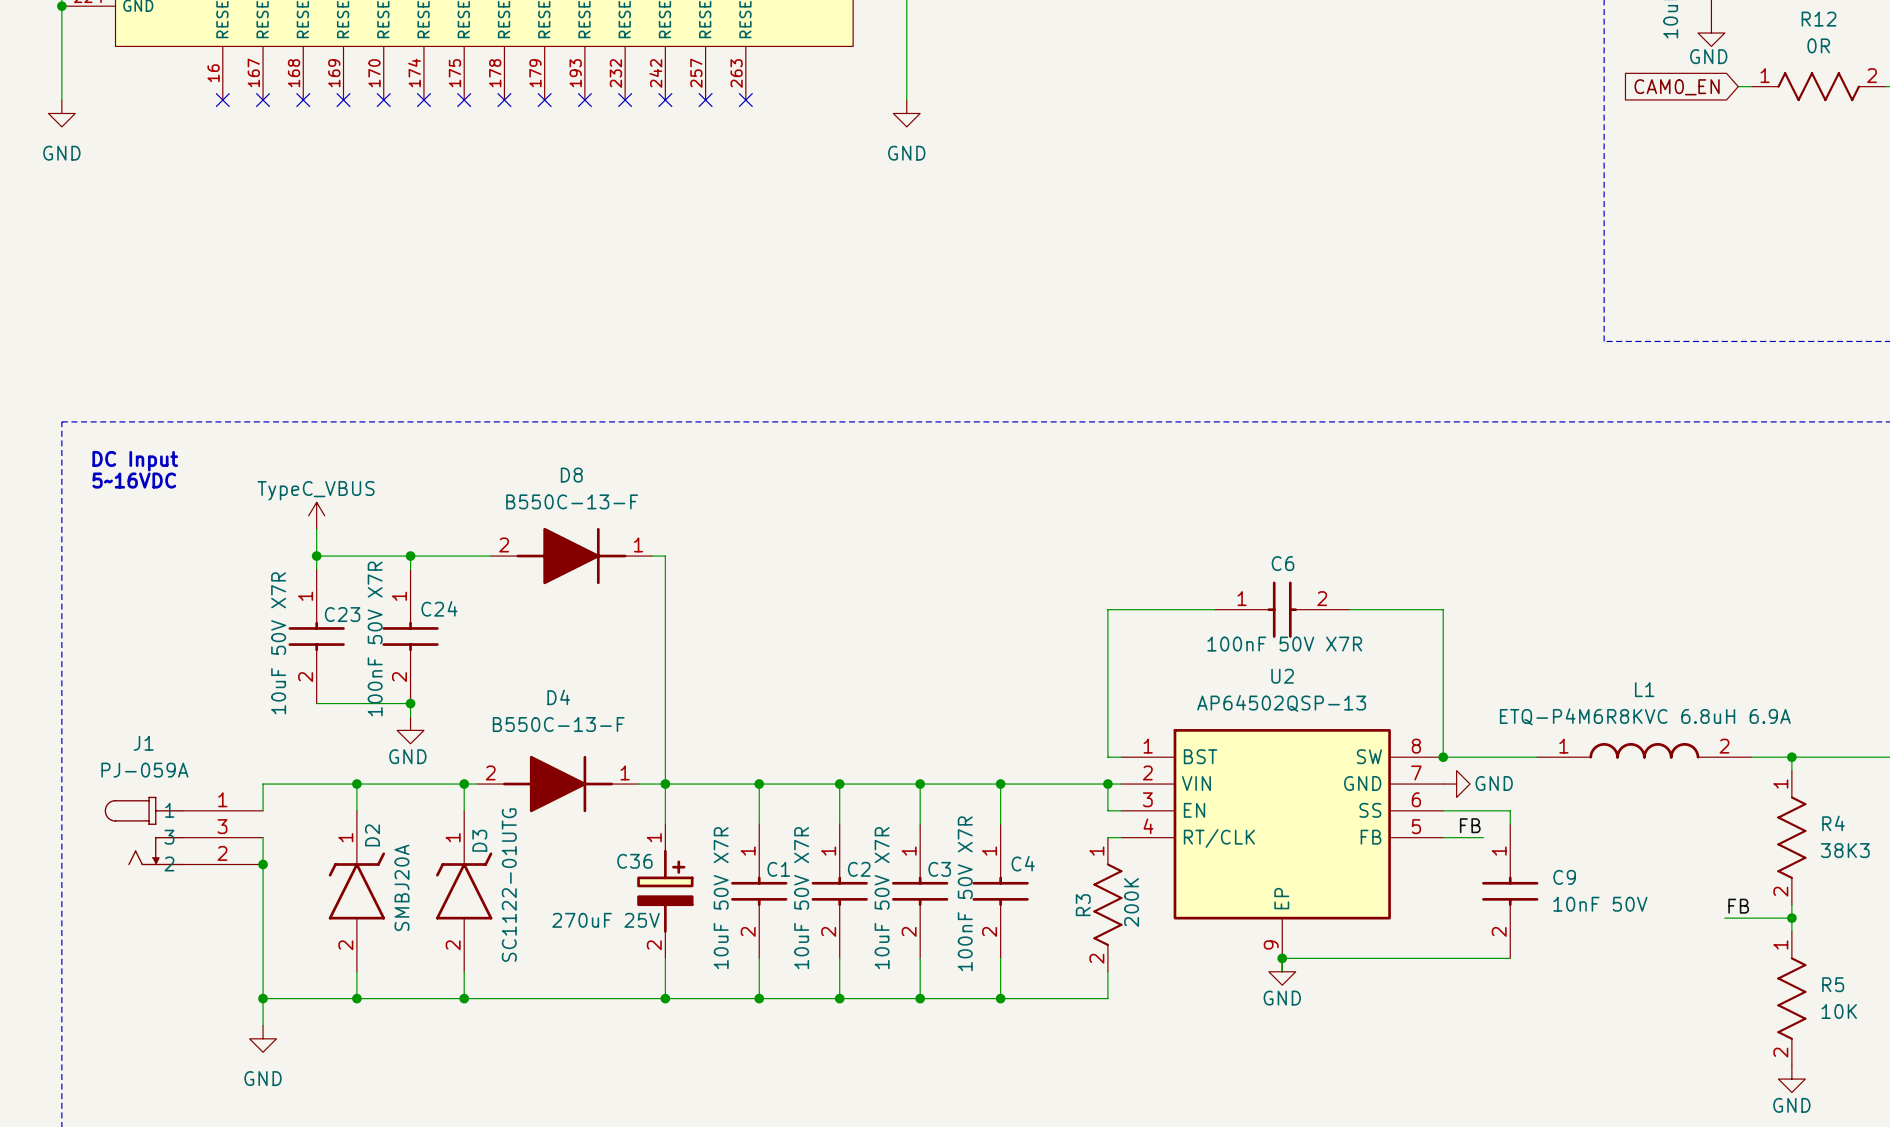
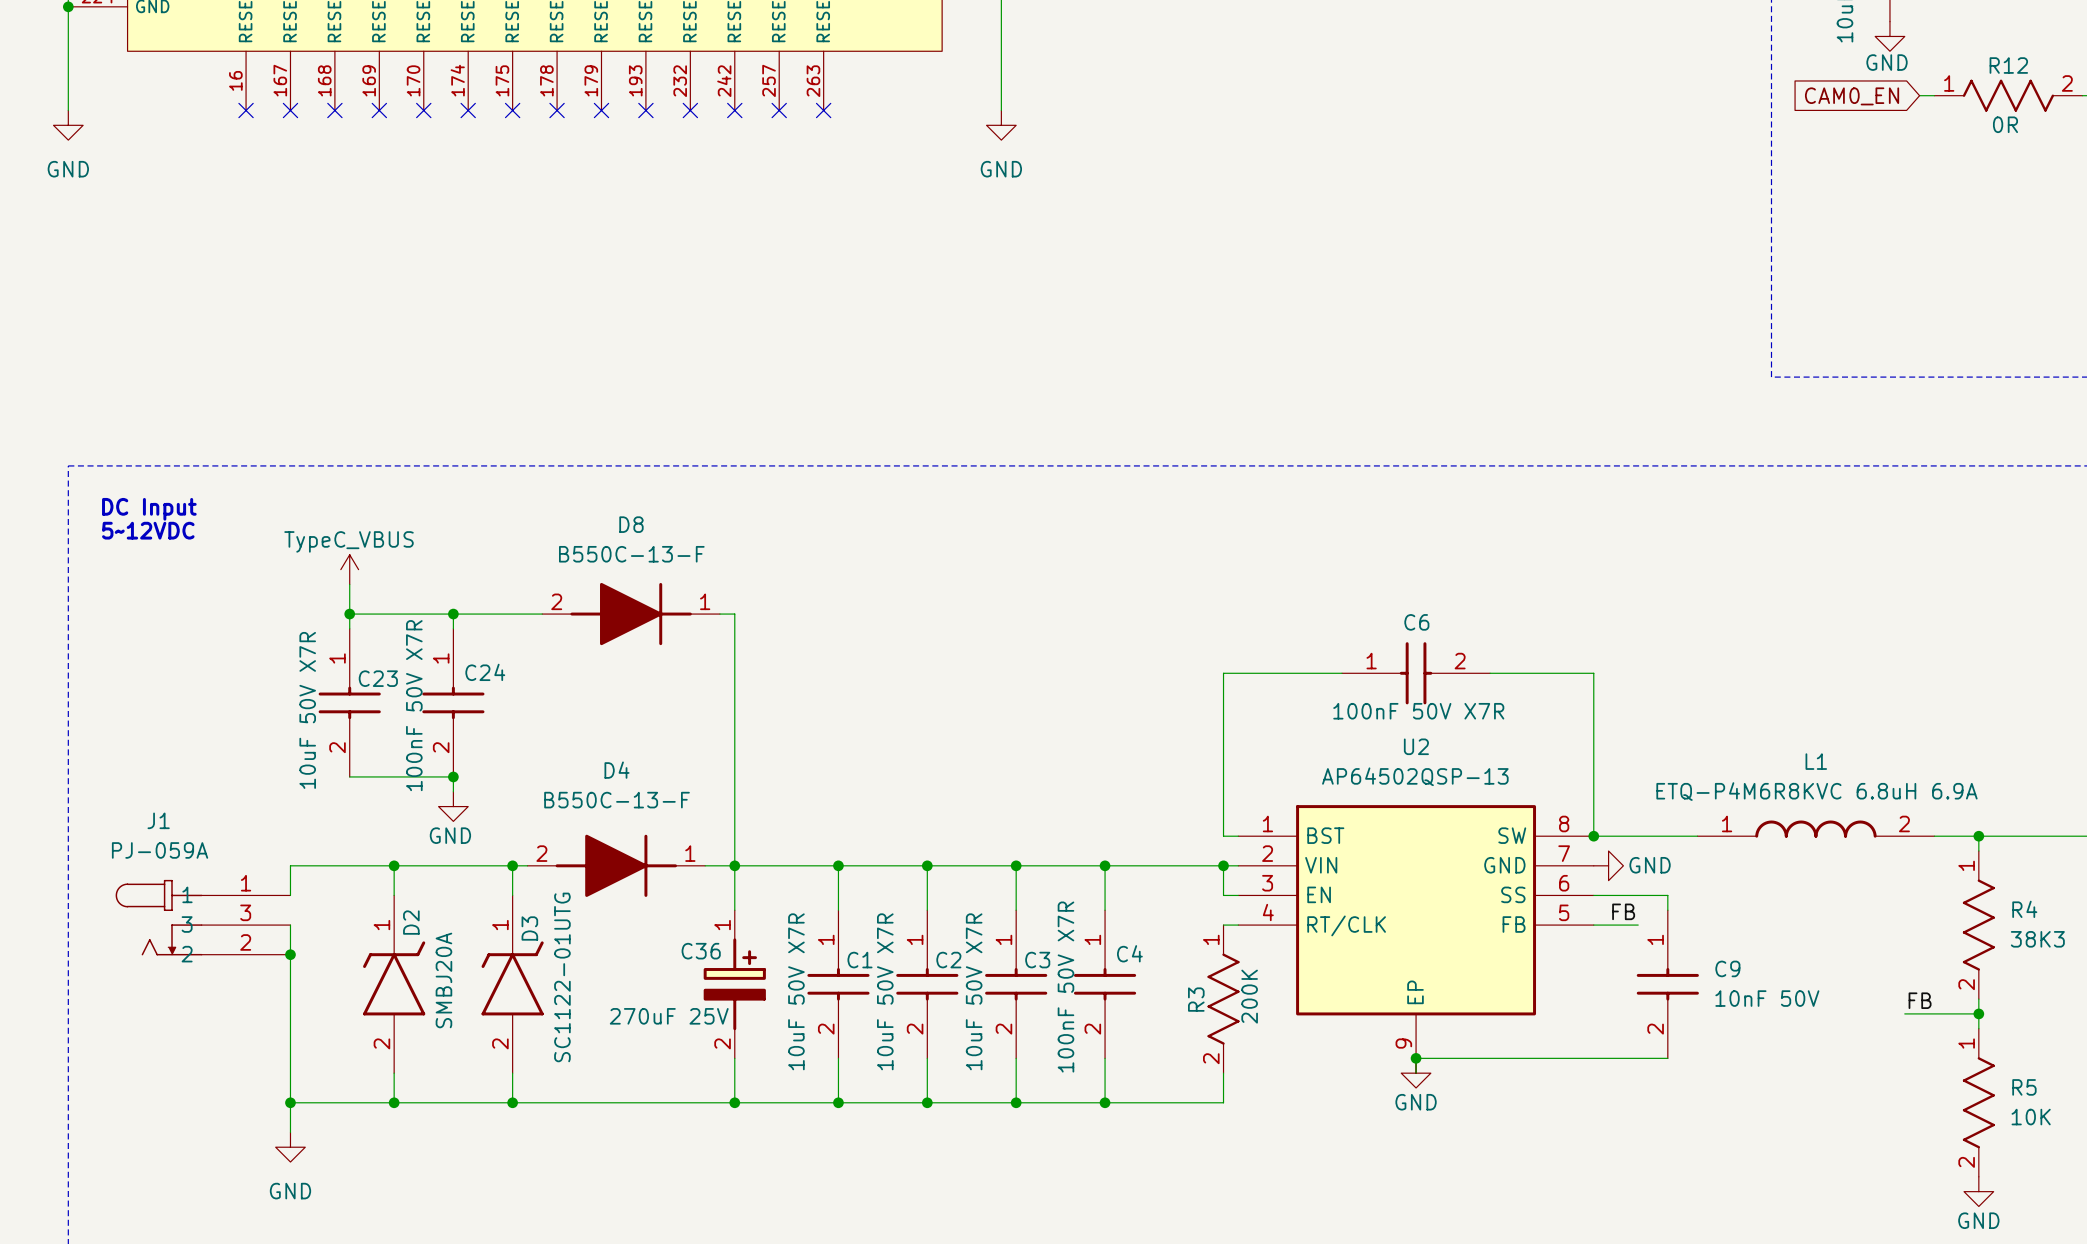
R12 name position: R12 (1819, 19) -> R12 (2008, 65)
R12 value position: 0R (1818, 45) -> 0R (2005, 124)
text: 5~16VDC (134, 480) -> 5~12VDC (148, 530)

